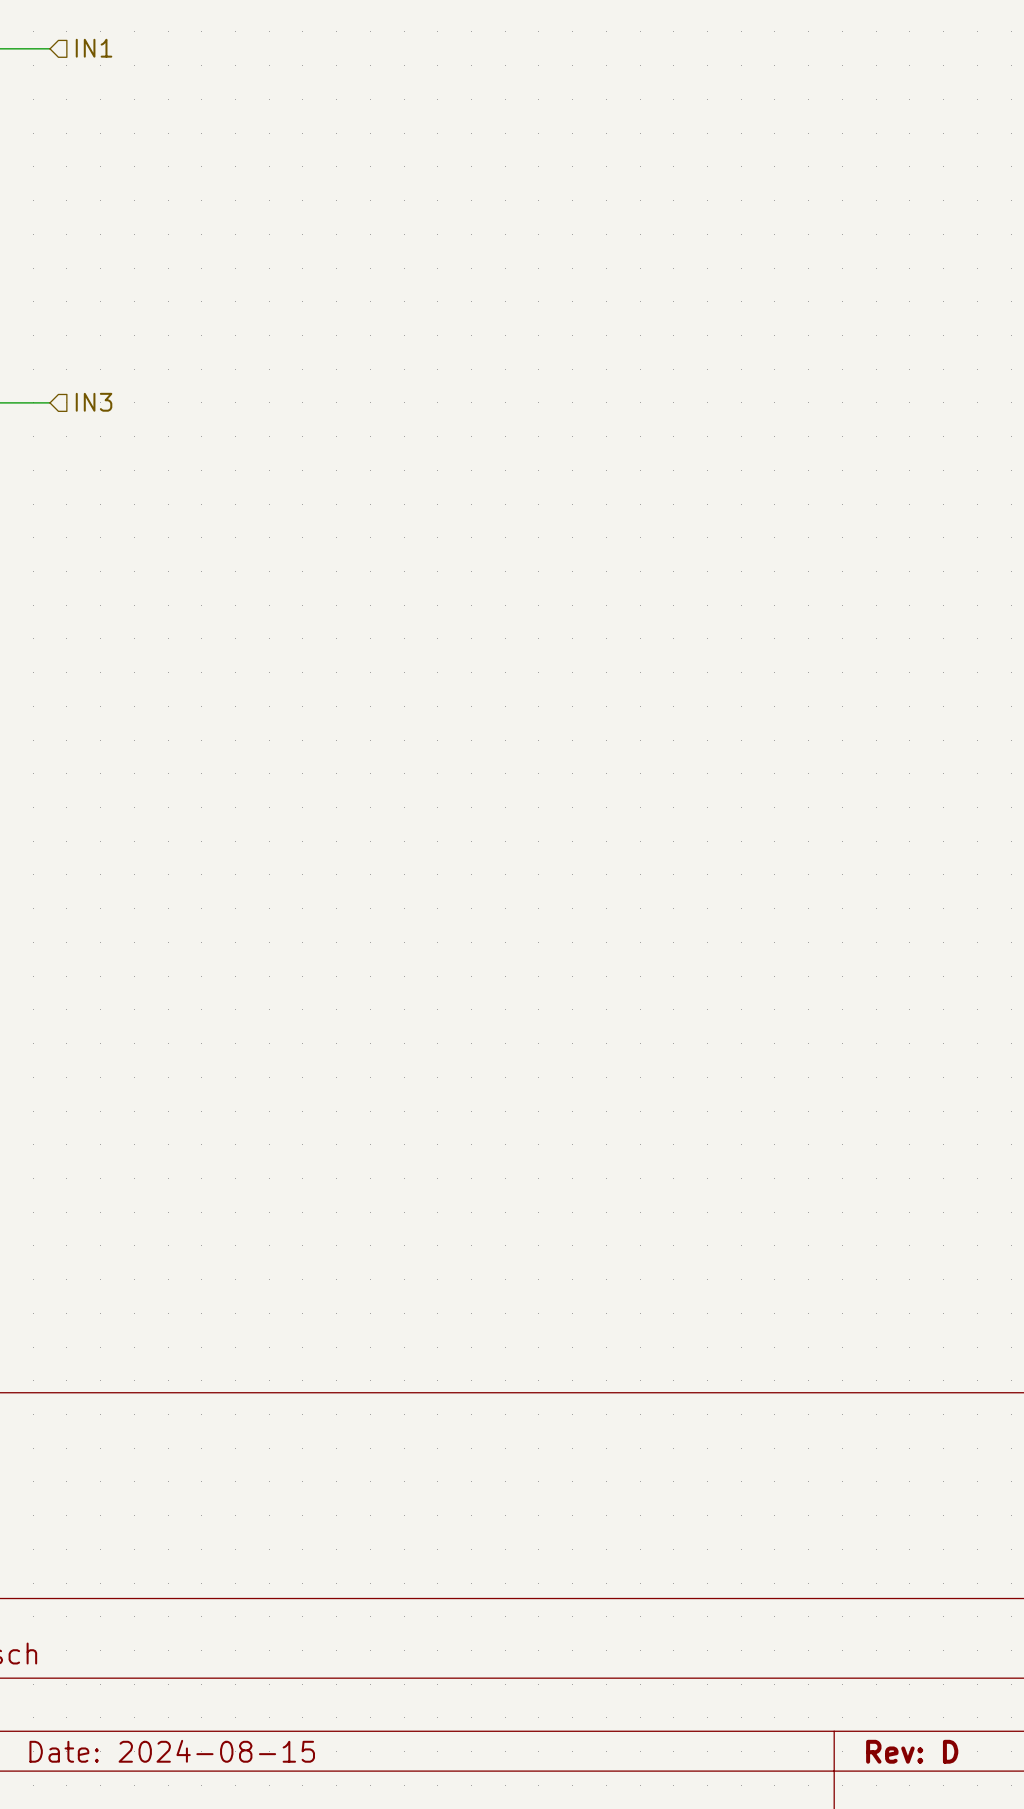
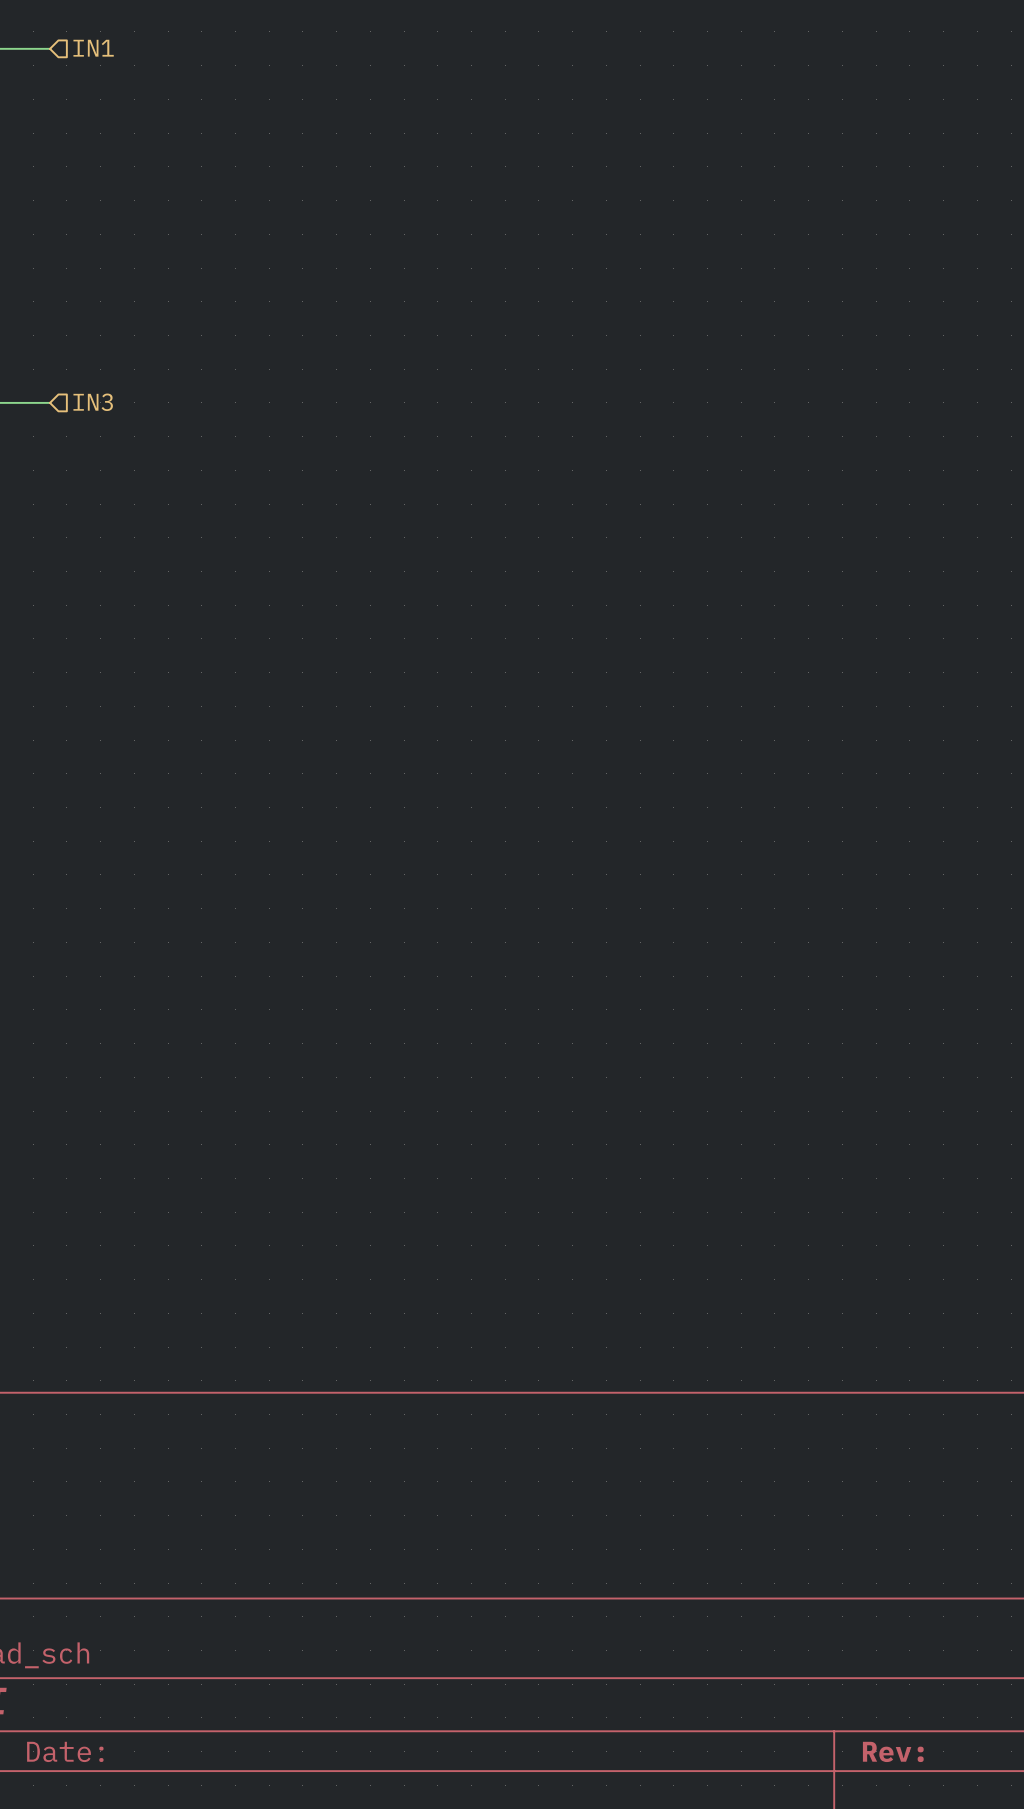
title block: Date: 2024-08-15 (172, 1751) -> Date: (65, 1751)
title block: Rev: D (912, 1751) -> Rev: (893, 1751)

